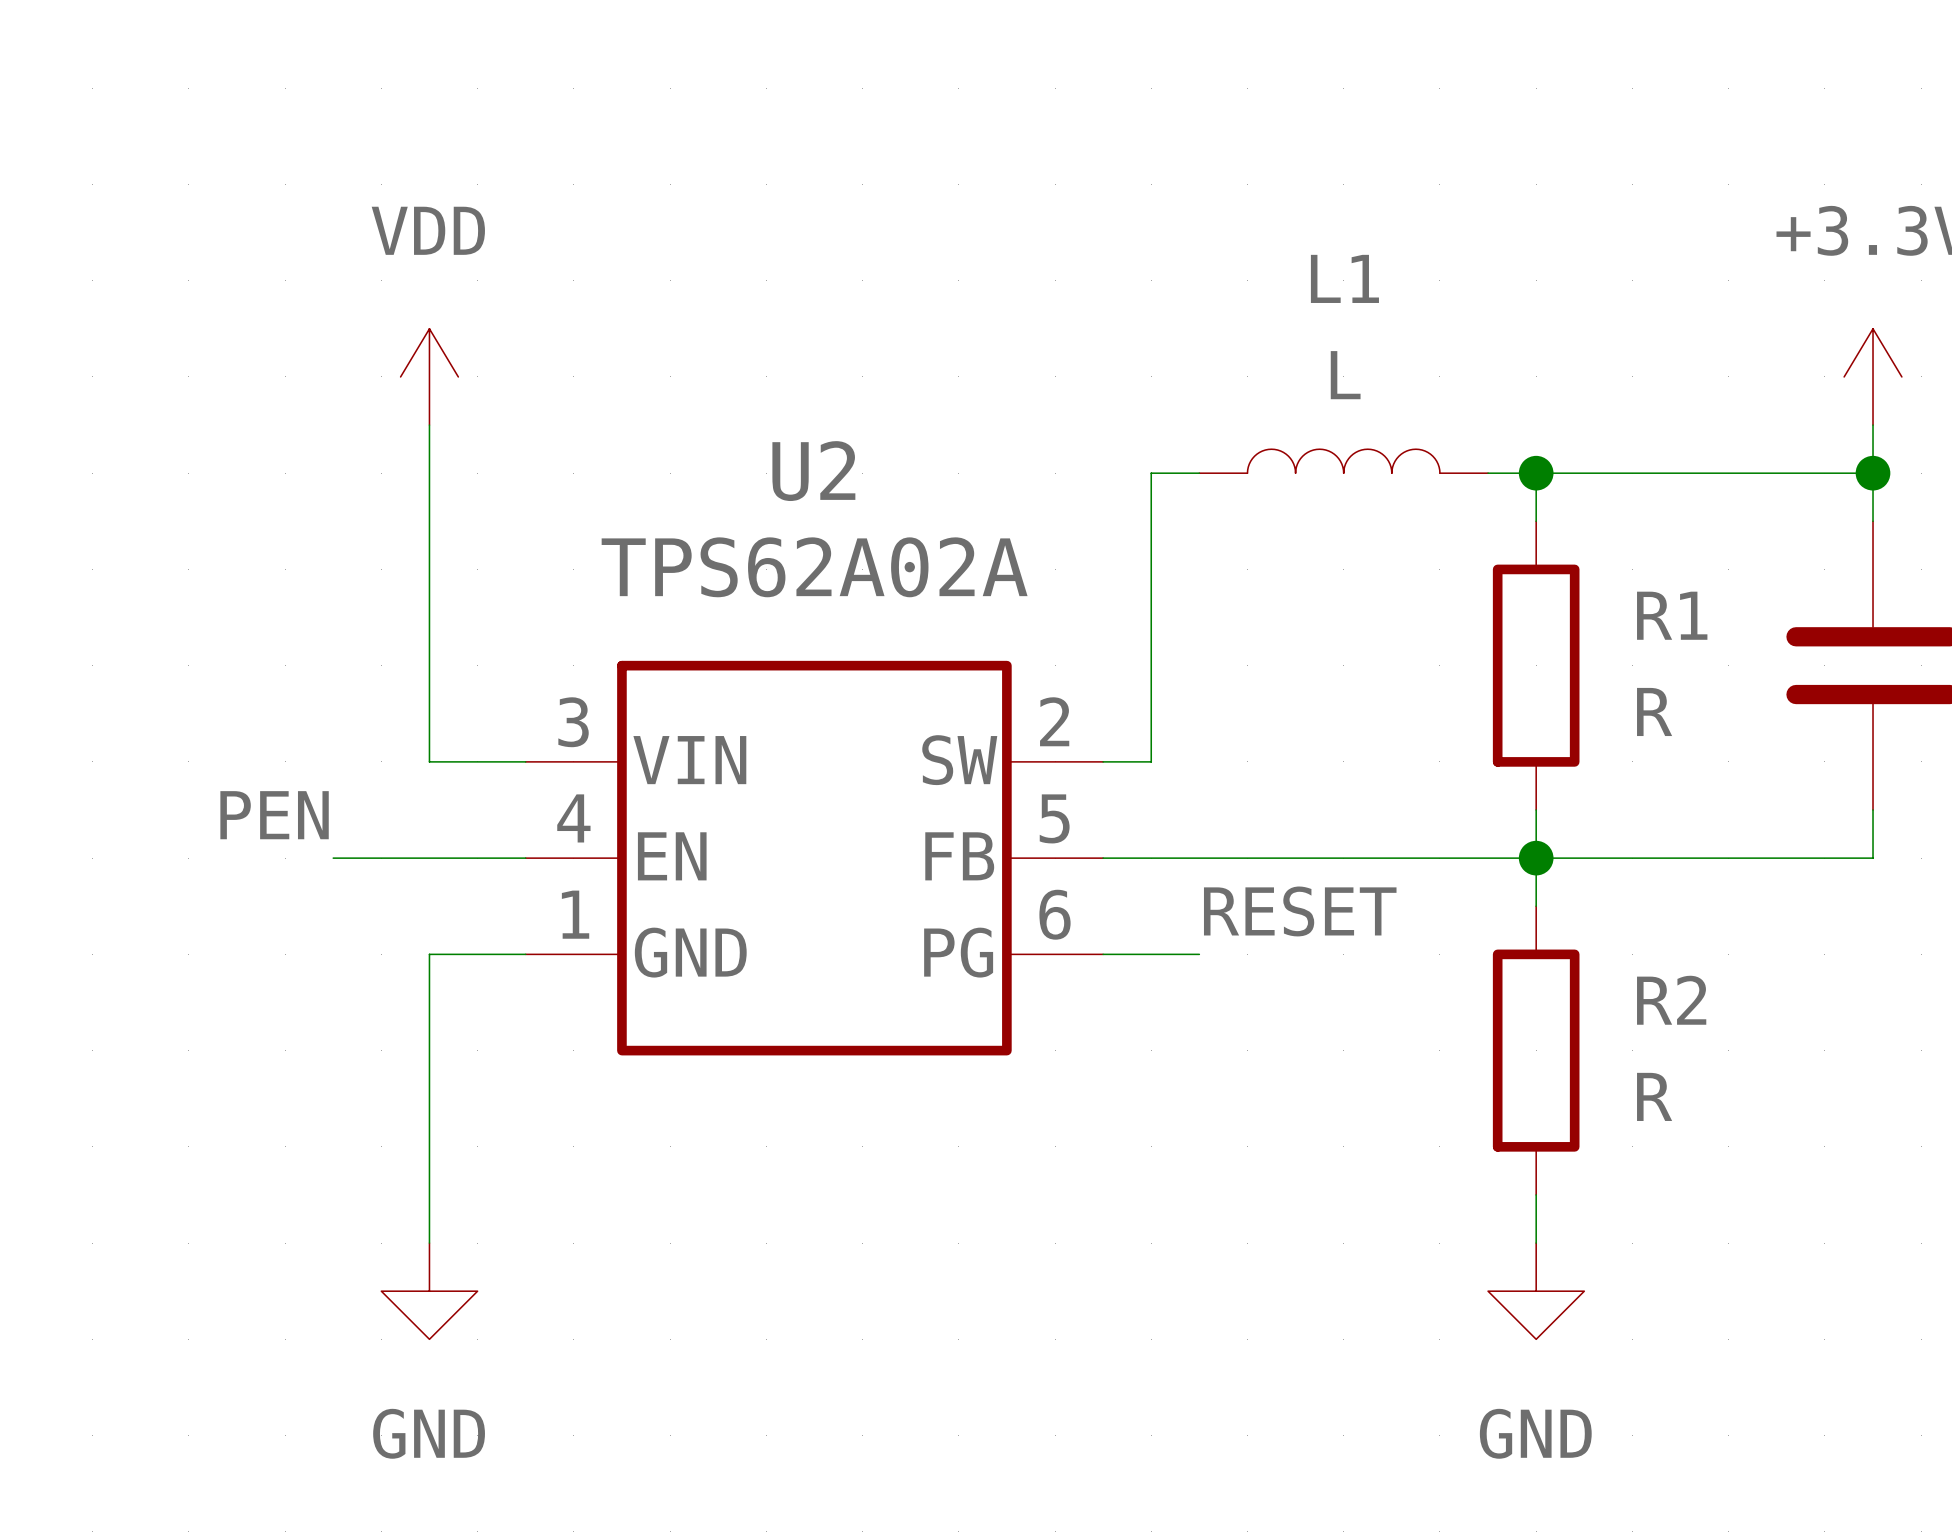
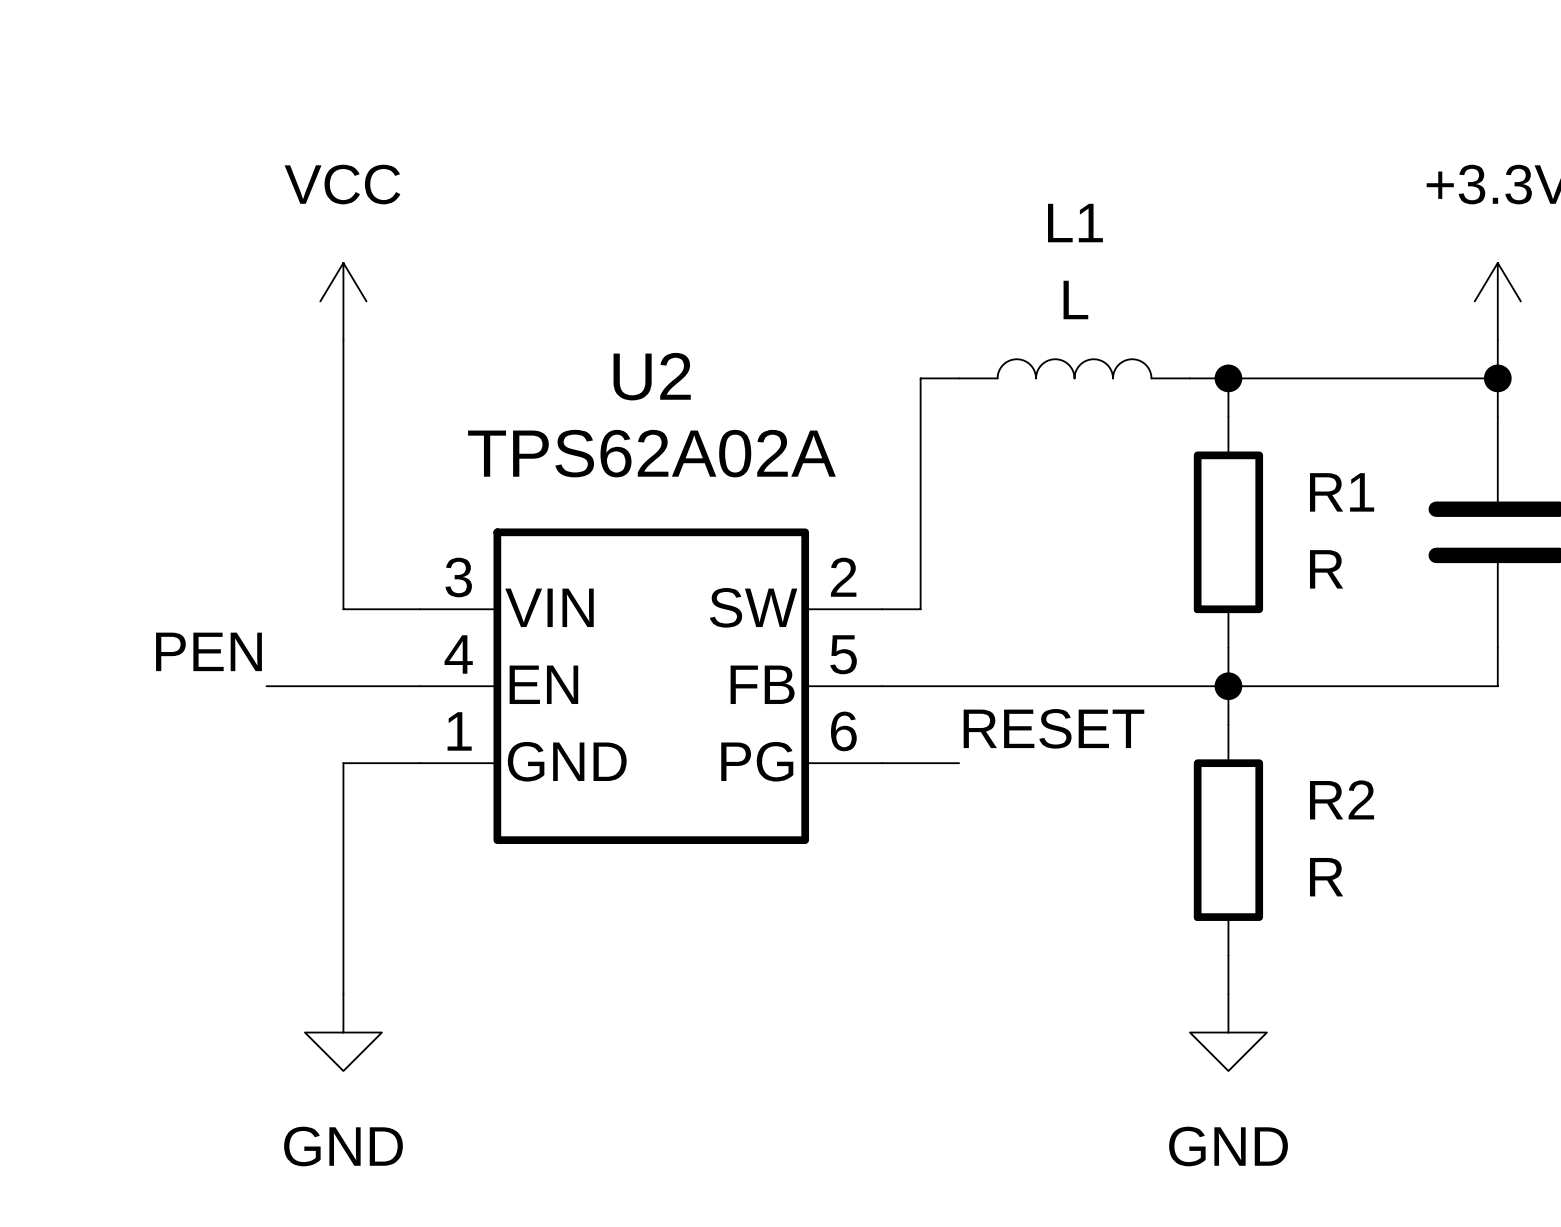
power symbol: VDD (429, 376) -> VCC (343, 301)

